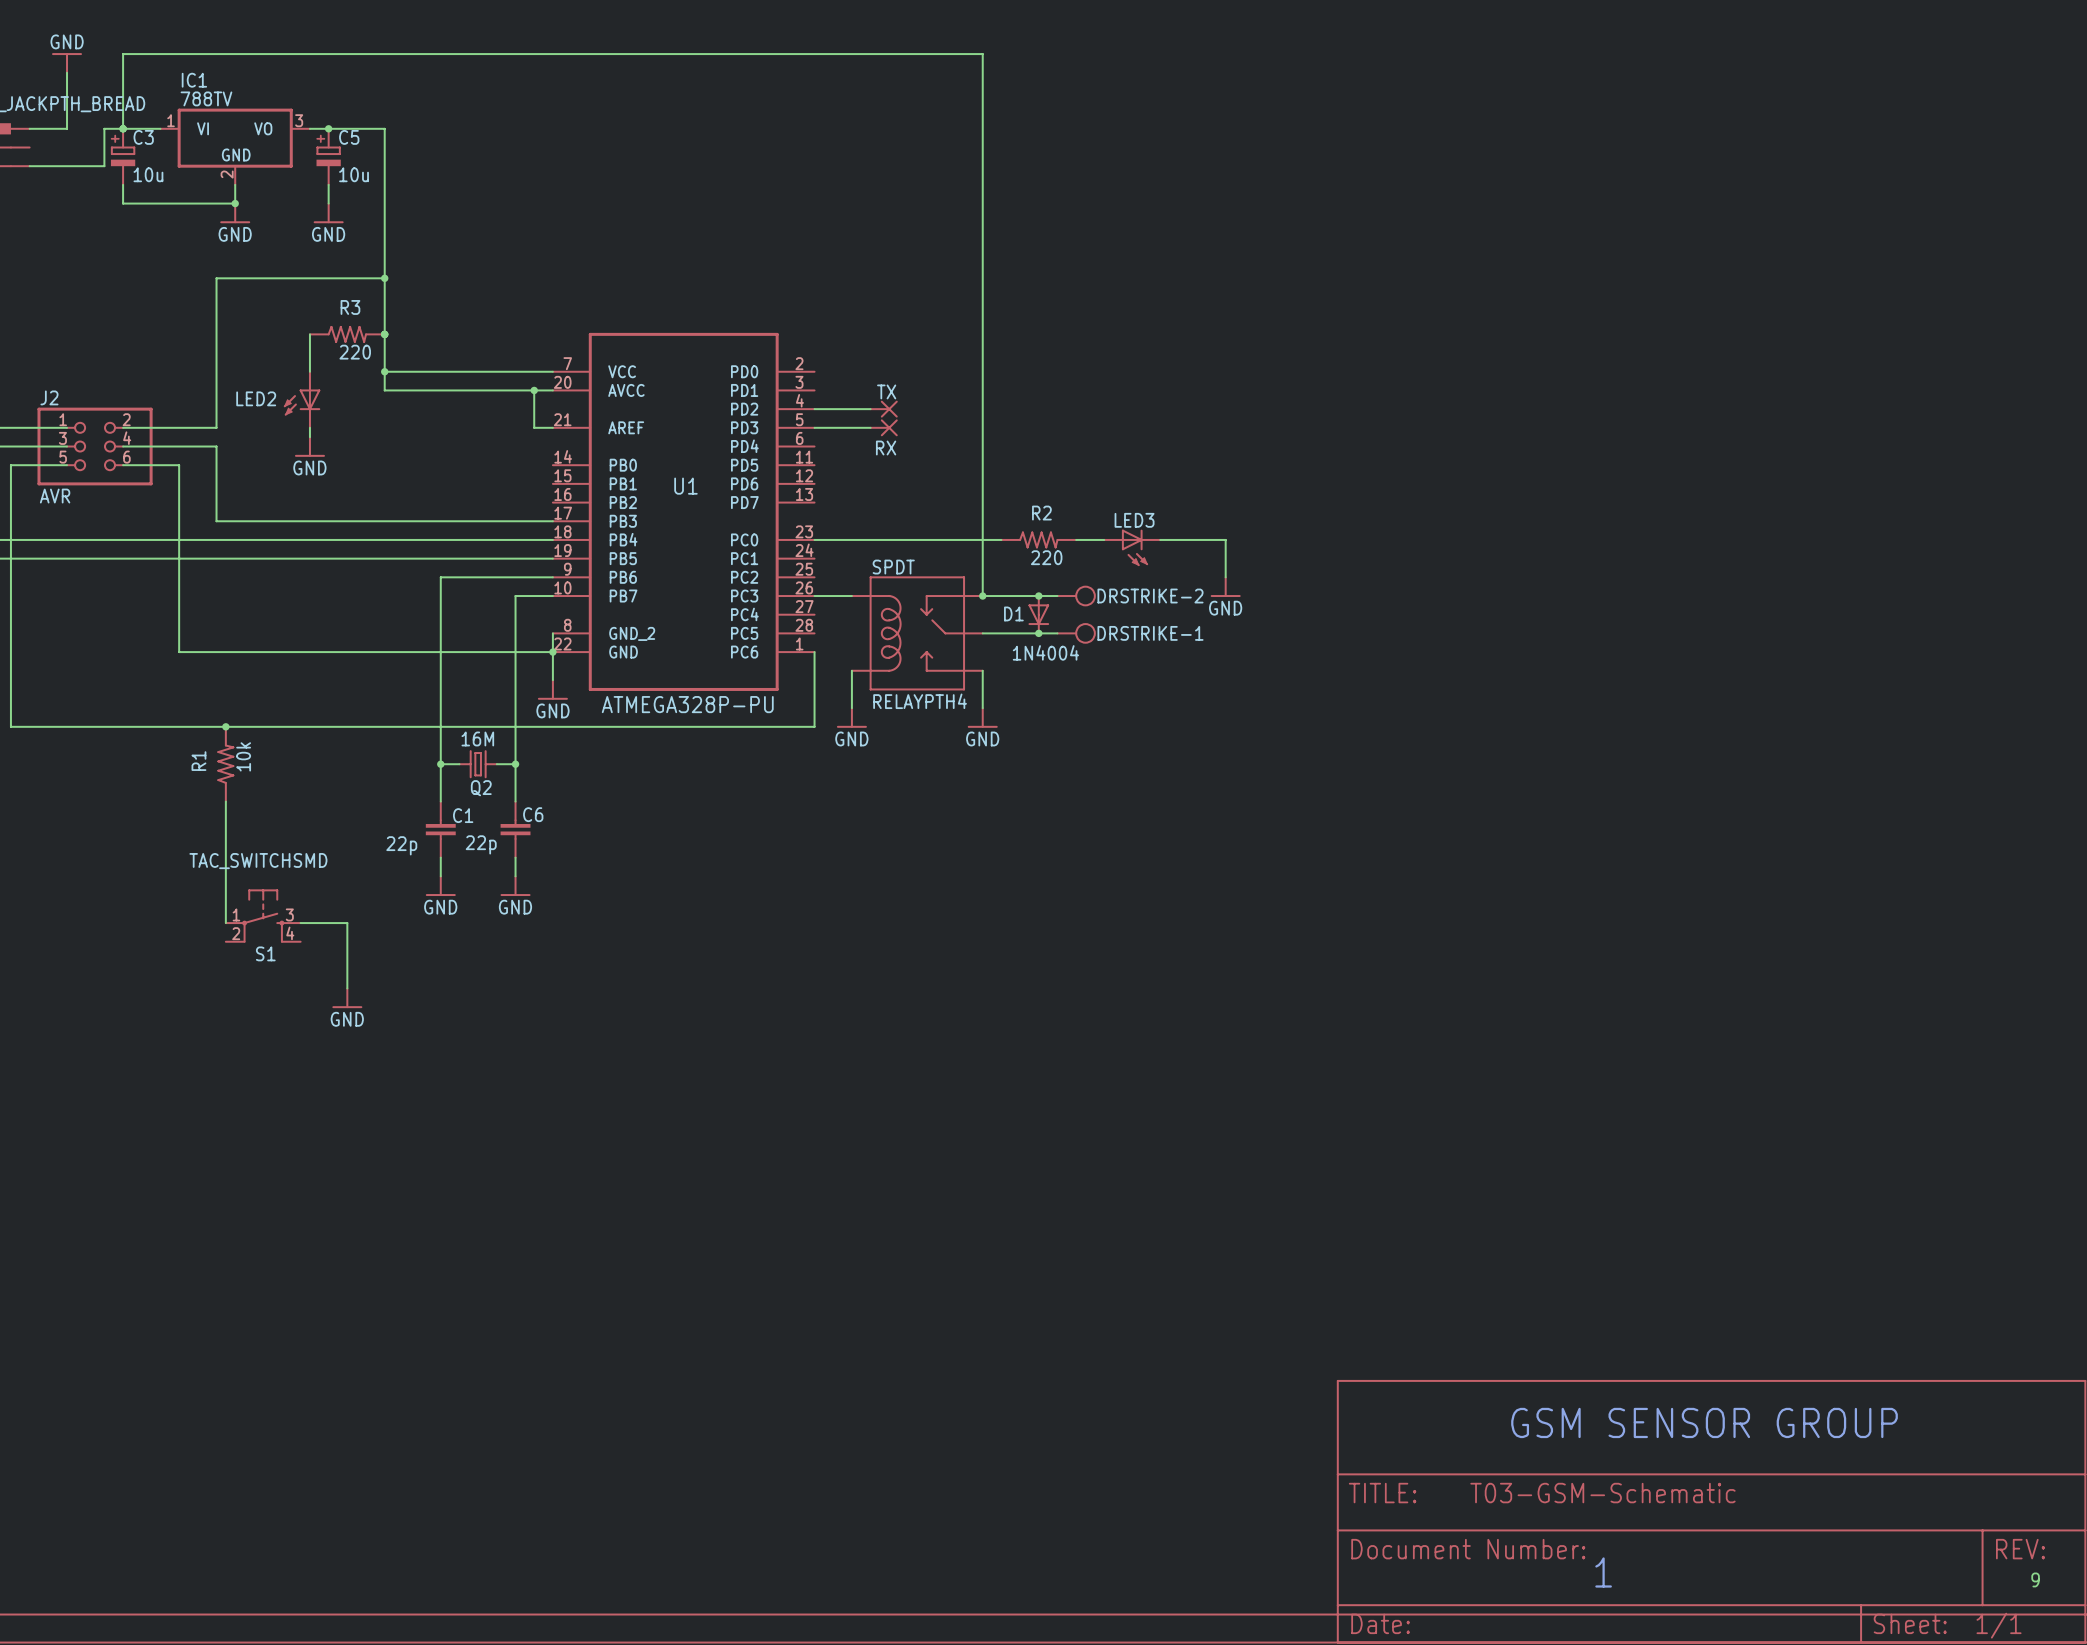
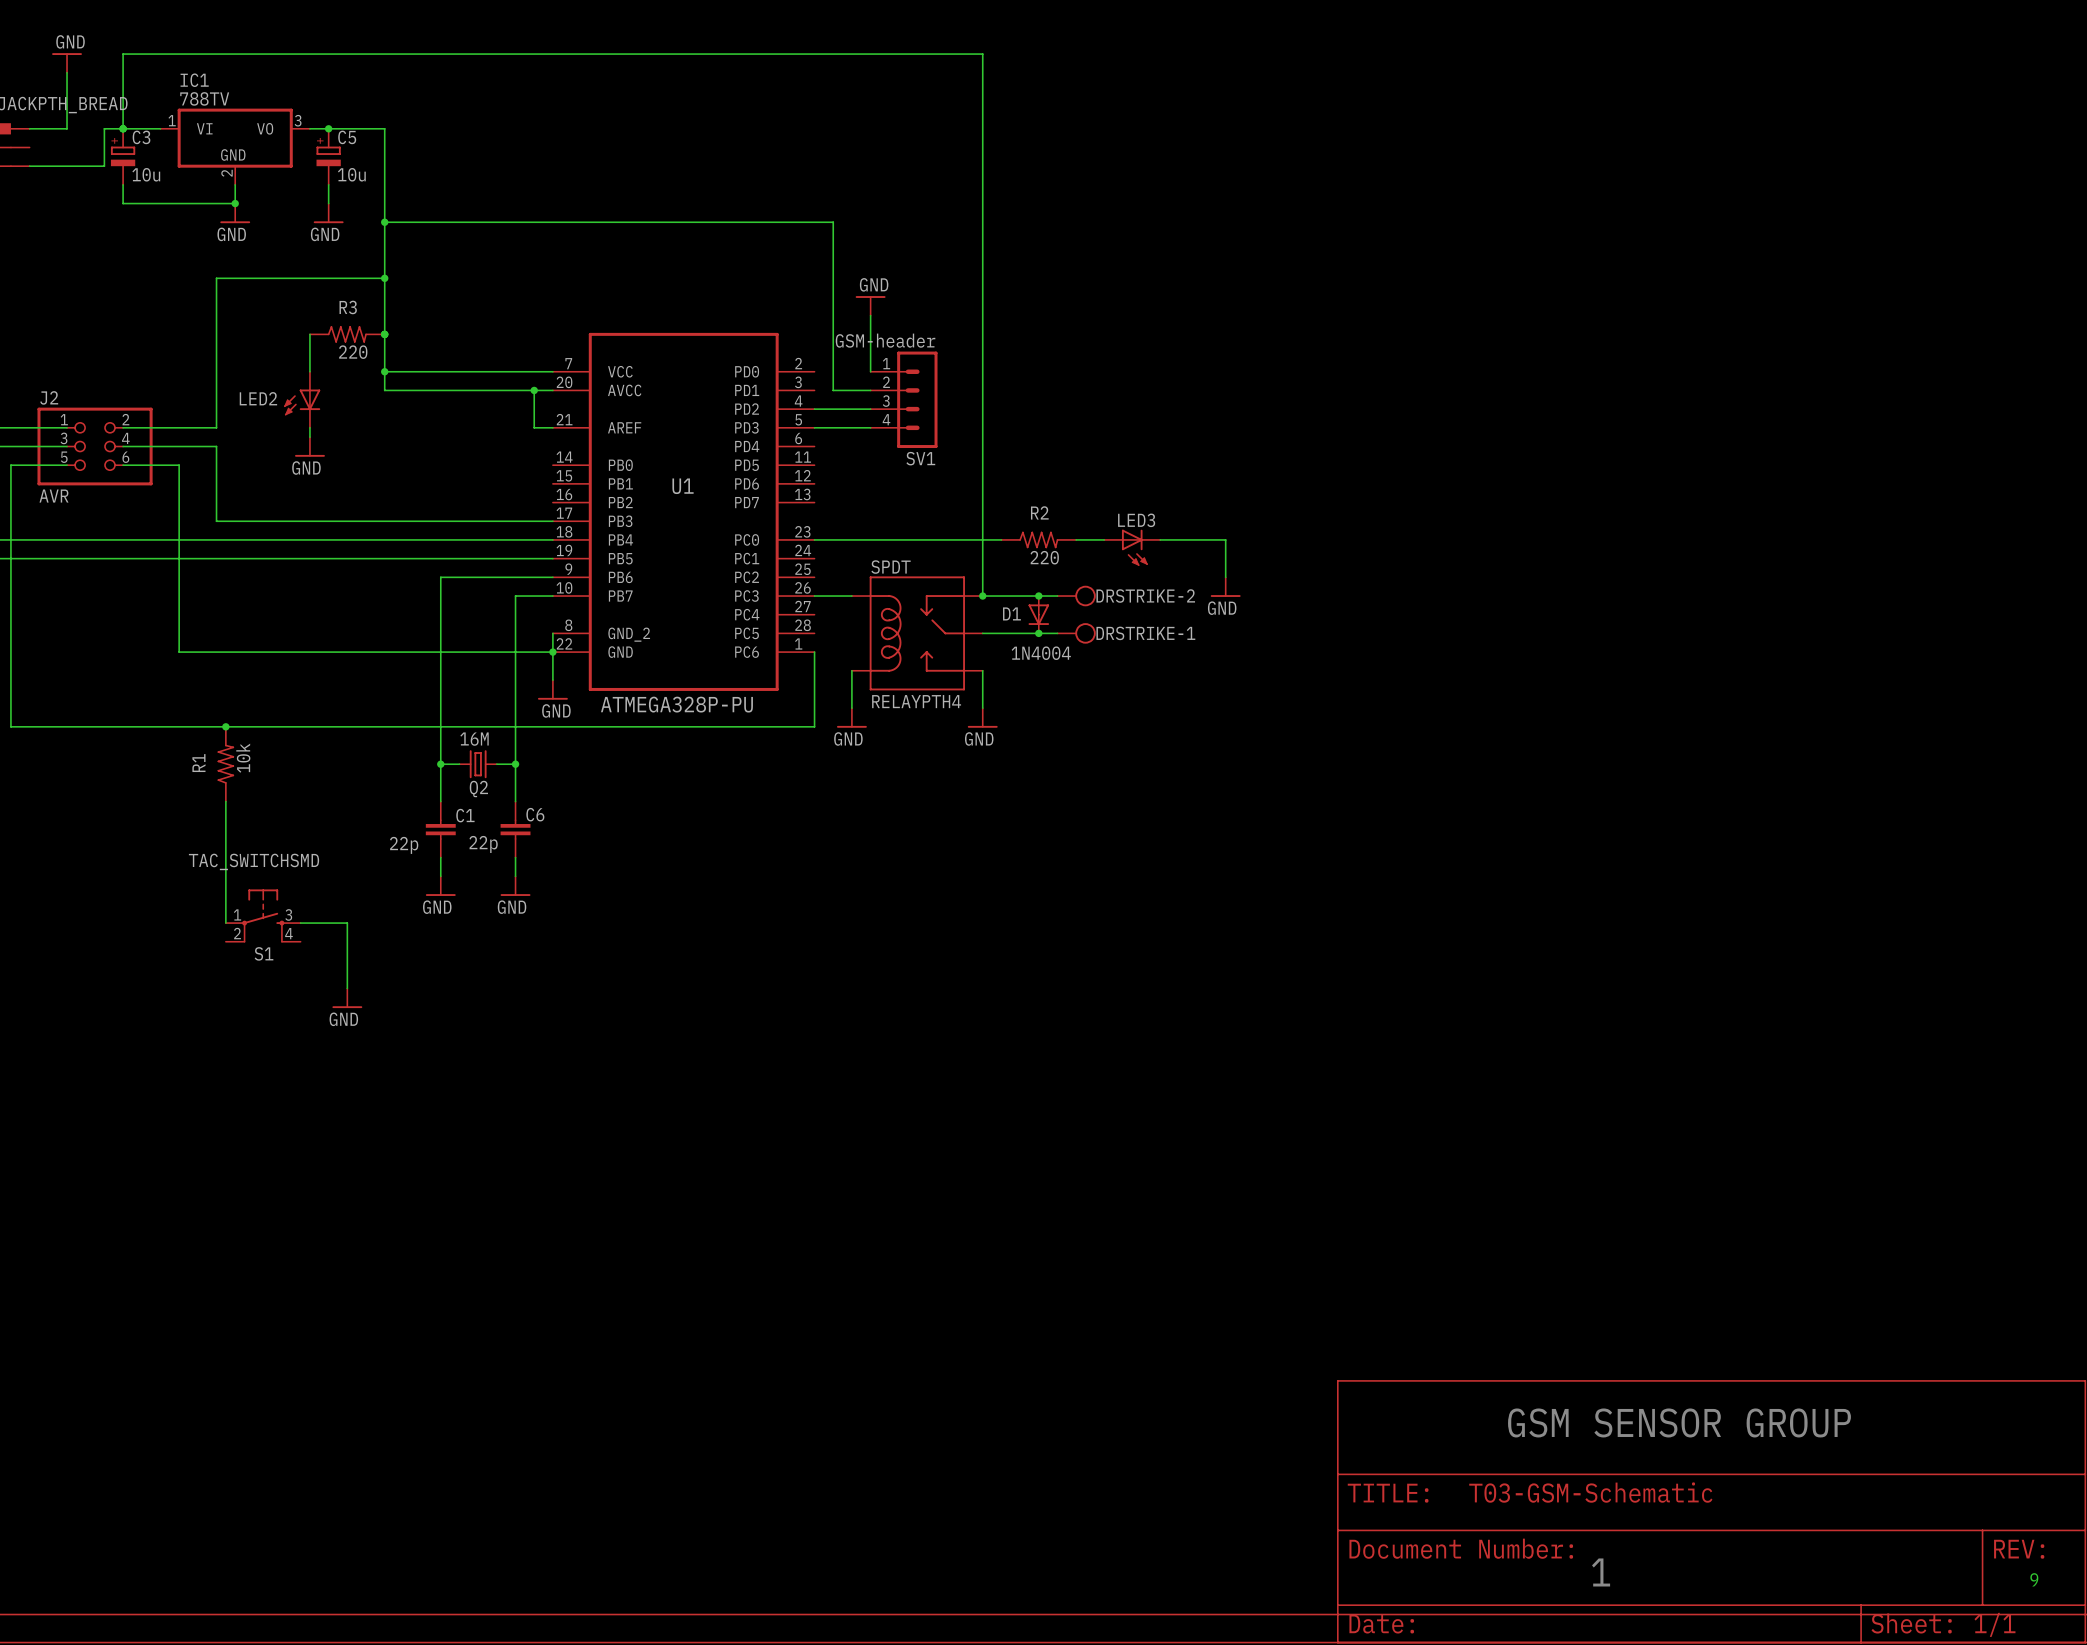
wire: none -> (384, 222) (833, 222) (833, 390) (870, 390)
junction: none -> (384, 222)
power symbol: none -> GND (870, 305)
wire: none -> (870, 315) (870, 371)
SV1: none -> GSM-header (904, 399)
TX: (884, 409) -> none
RX: (884, 427) -> none

